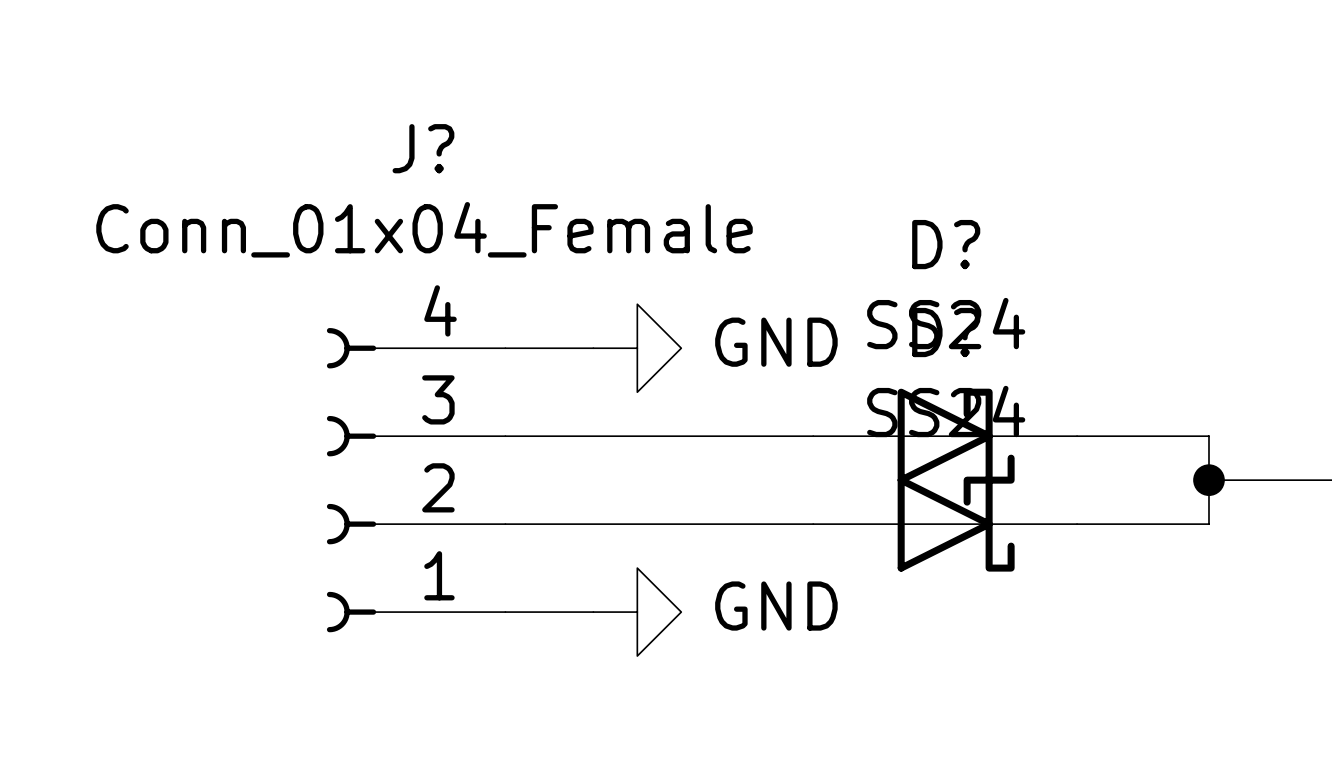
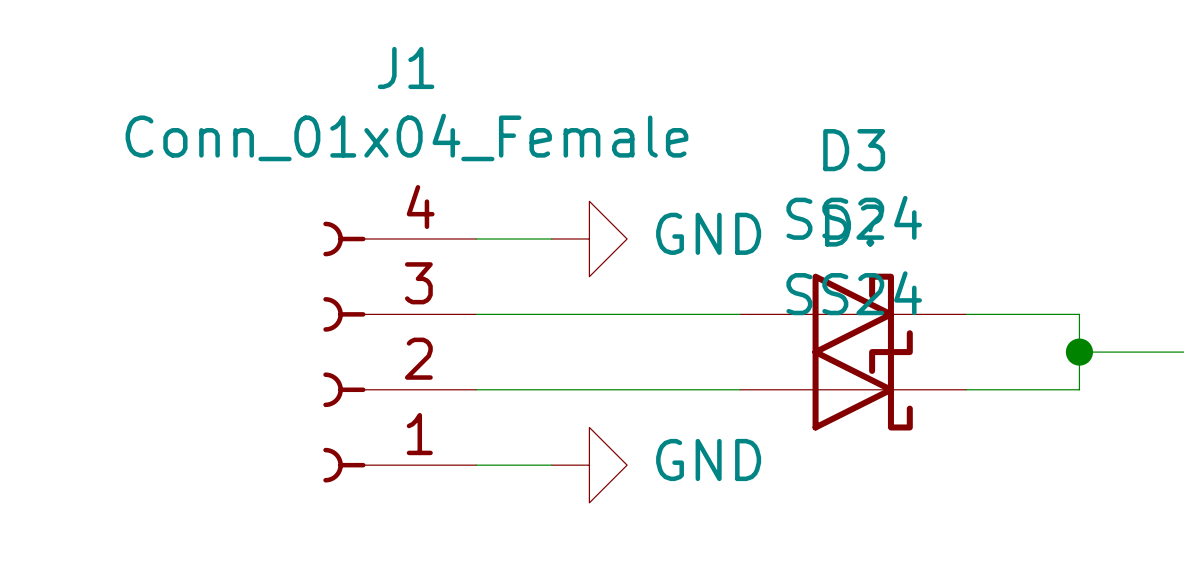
J? name: J? (423, 148) -> J1 (406, 67)
D? name: D? (946, 244) -> D3 (854, 150)

